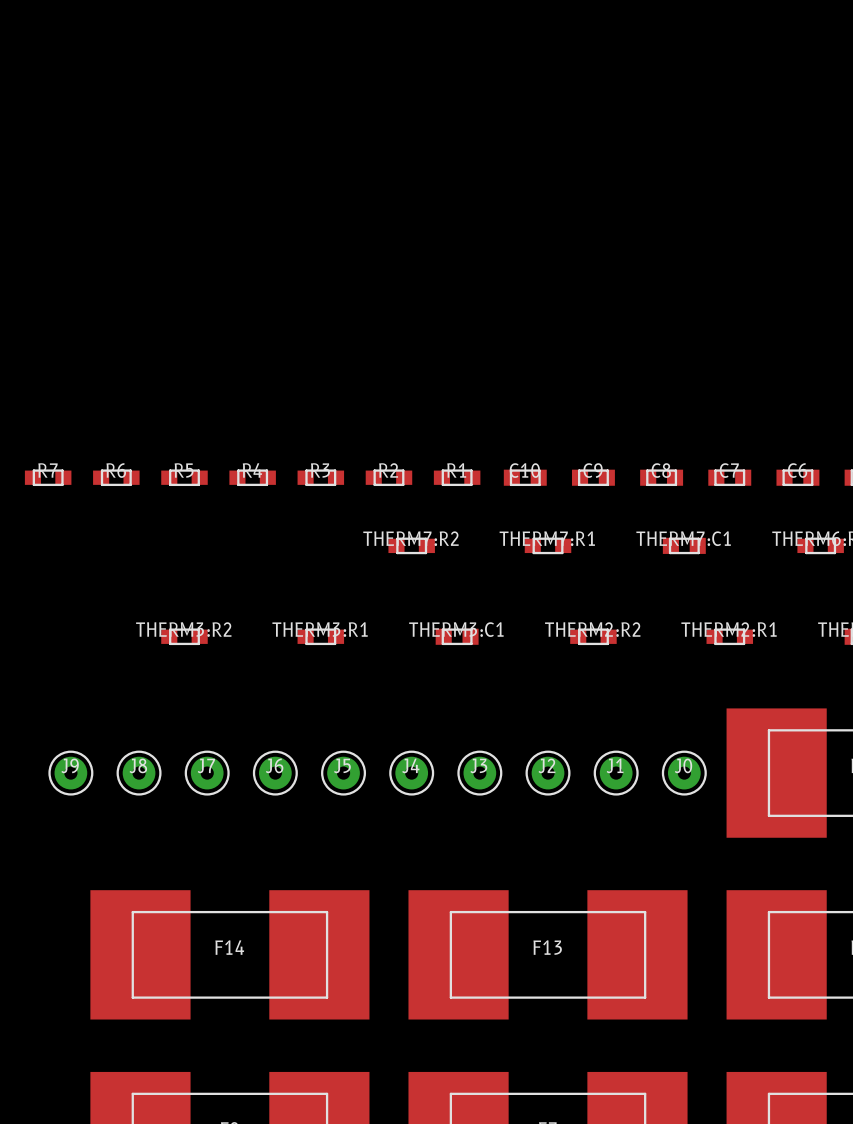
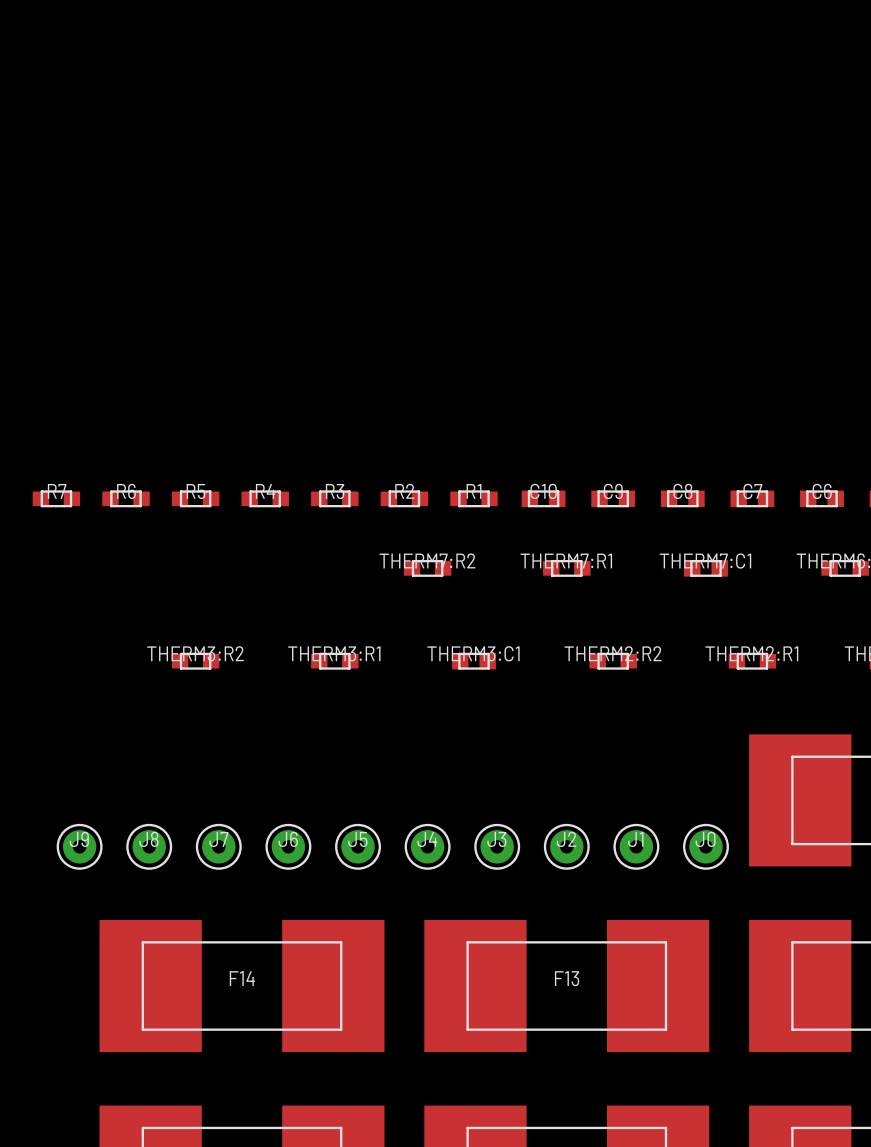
J9 position: (70, 773) -> (79, 846)
J8 position: (139, 773) -> (149, 846)
J7 position: (207, 773) -> (218, 846)
J6 position: (275, 773) -> (288, 846)
J5 position: (343, 773) -> (358, 846)
J4 position: (411, 773) -> (427, 846)
J3 position: (479, 773) -> (497, 846)
J2 position: (548, 773) -> (566, 846)
J1 position: (616, 773) -> (636, 846)
J0 position: (684, 773) -> (705, 846)

